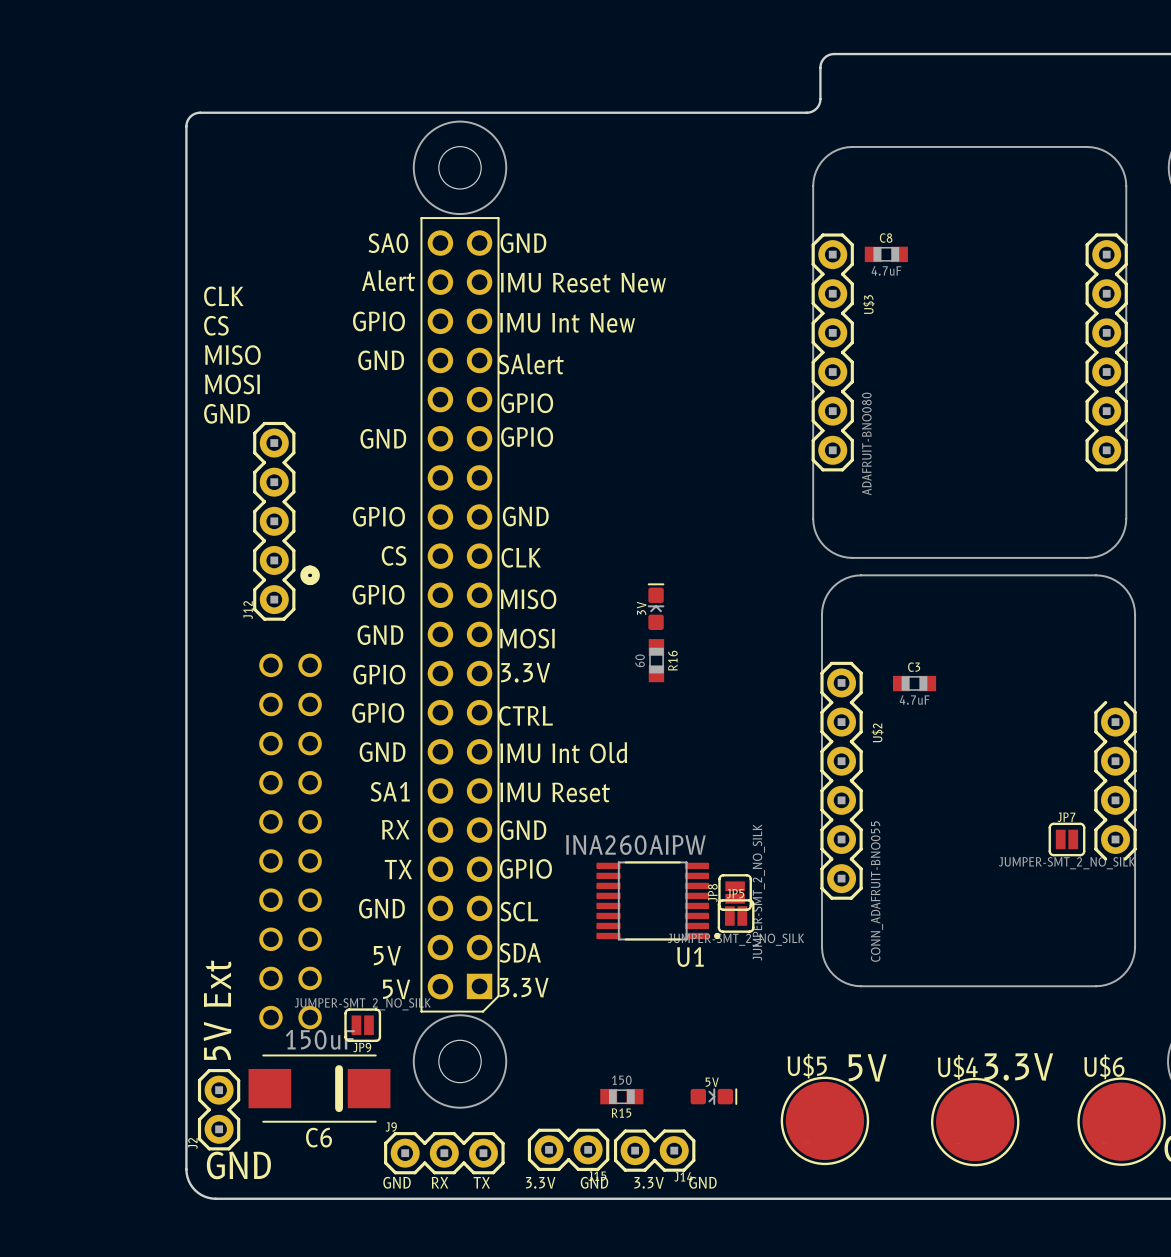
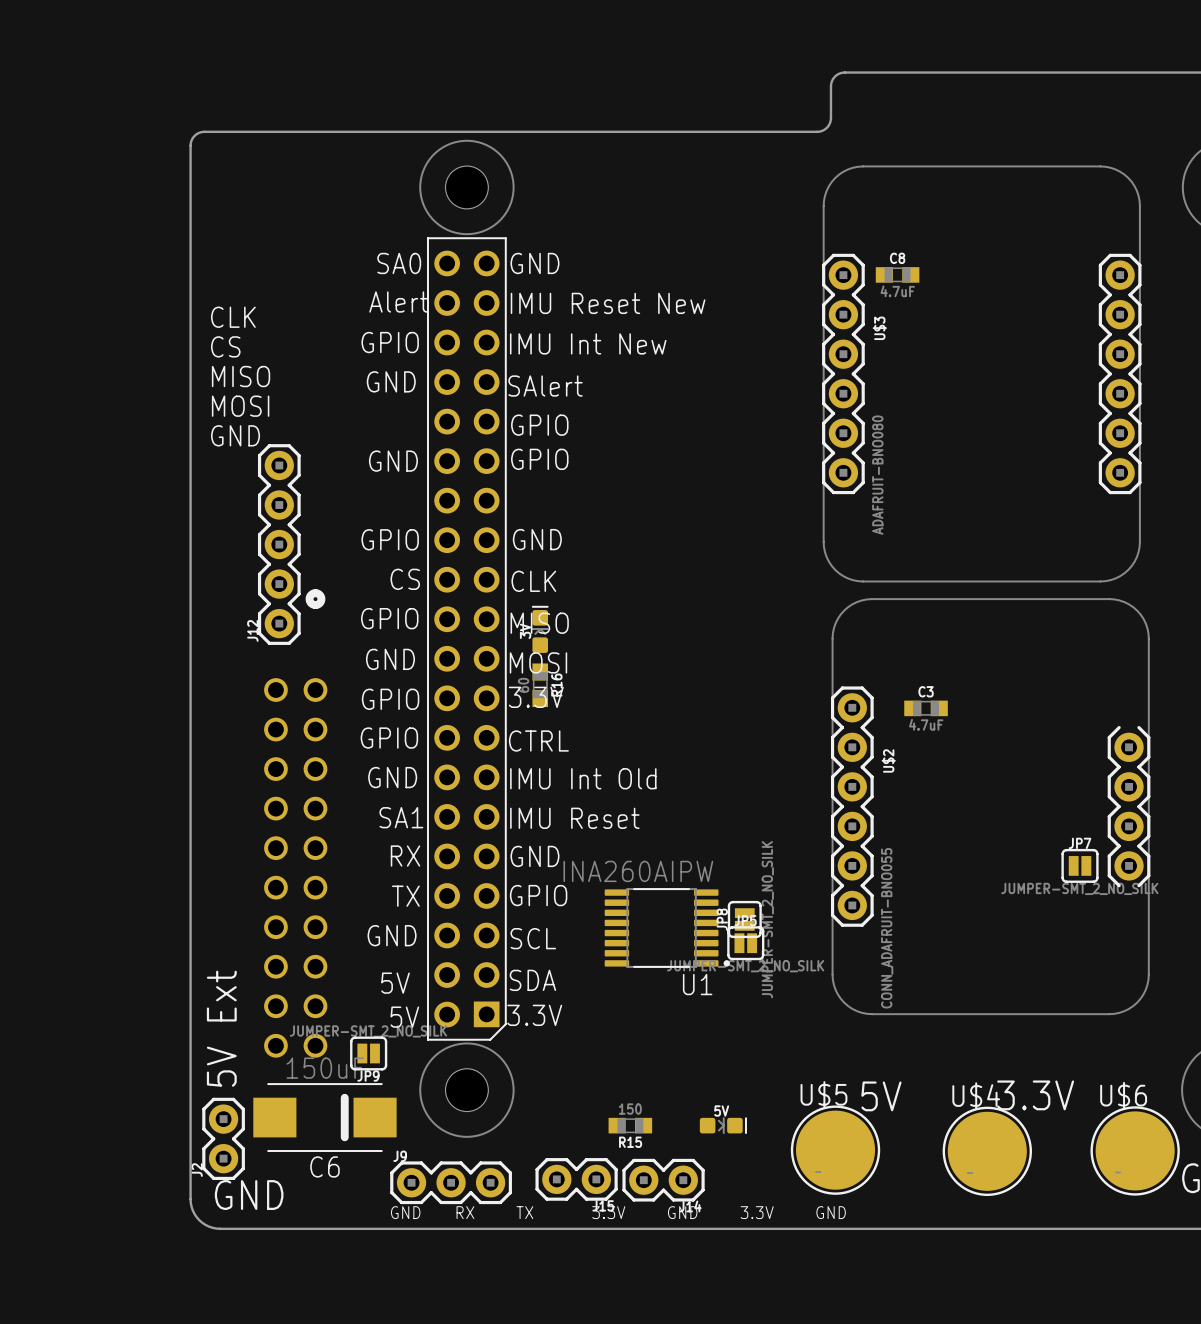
3V position: (656, 606) -> (540, 629)
R16 position: (656, 660) -> (540, 685)

